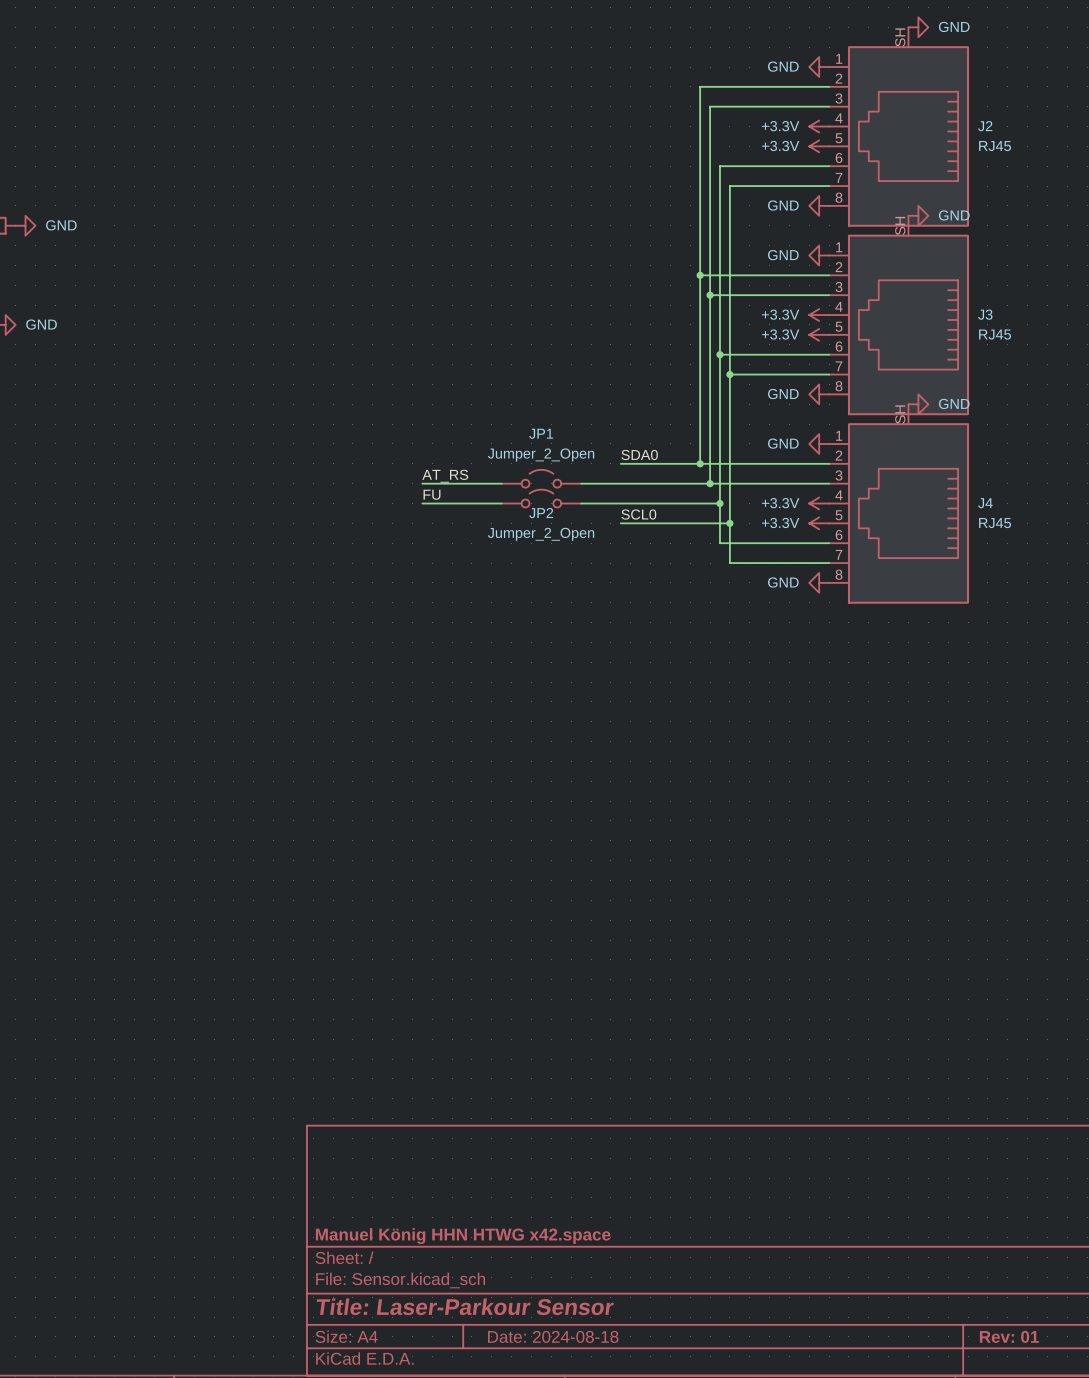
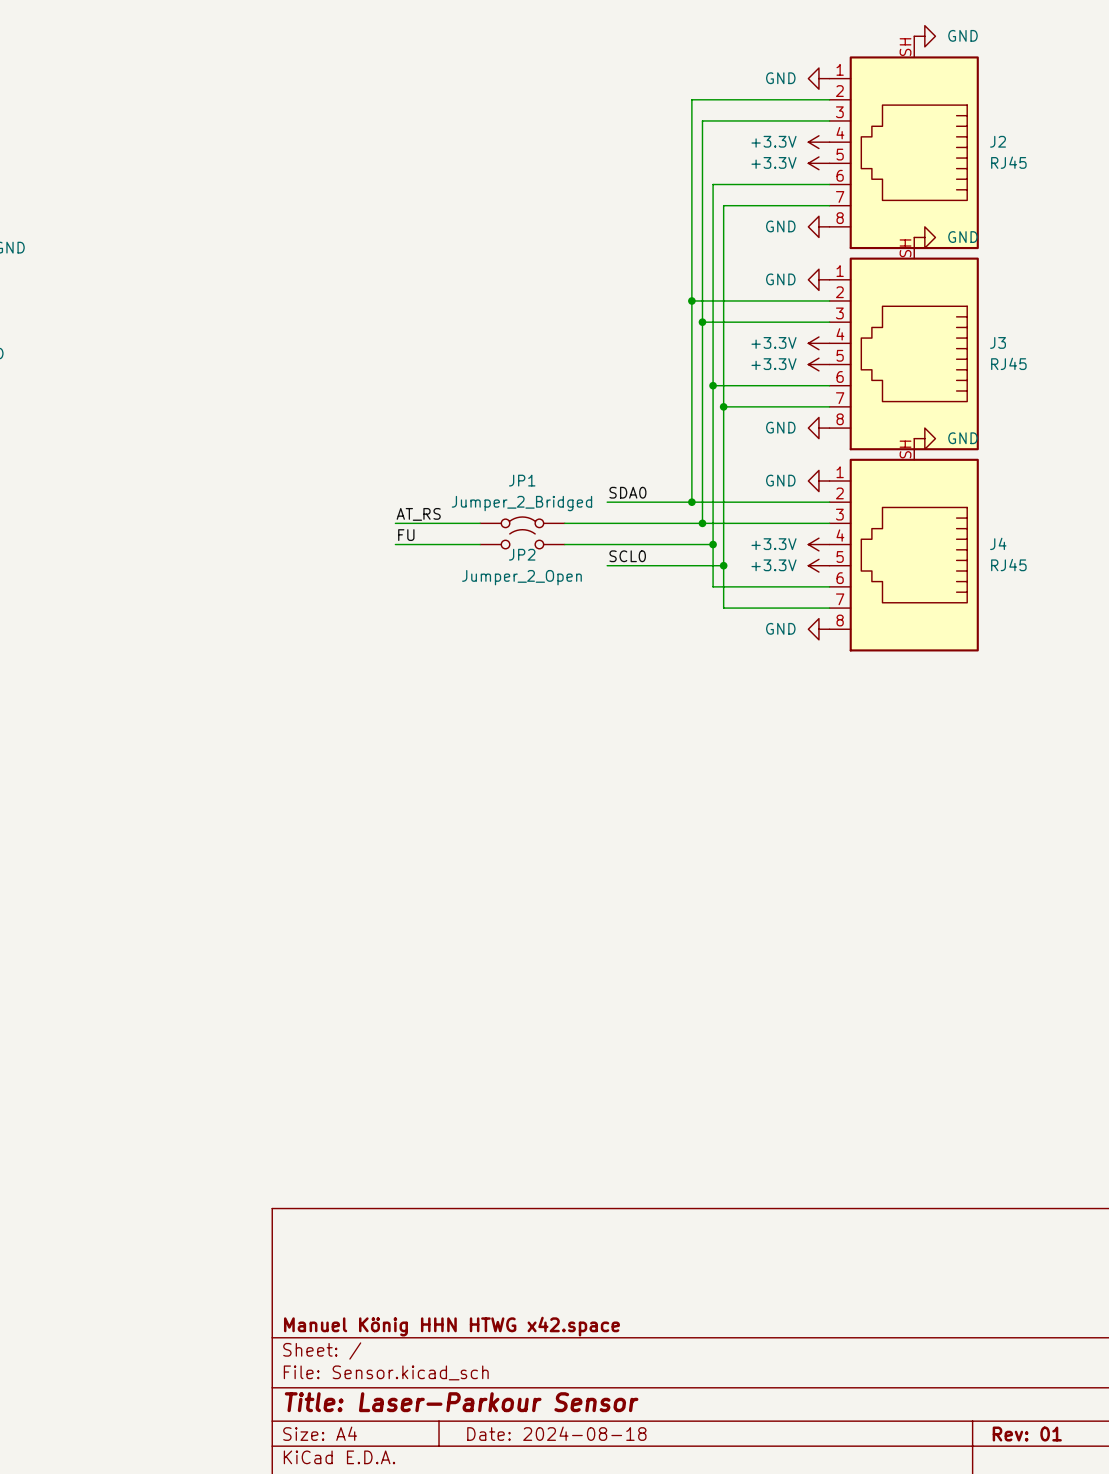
JP1 value: Jumper_2_Open (541, 454) -> Jumper_2_Bridged (521, 503)
JP1 symbol: [501, 469, 582, 488] -> [480, 517, 565, 528]

